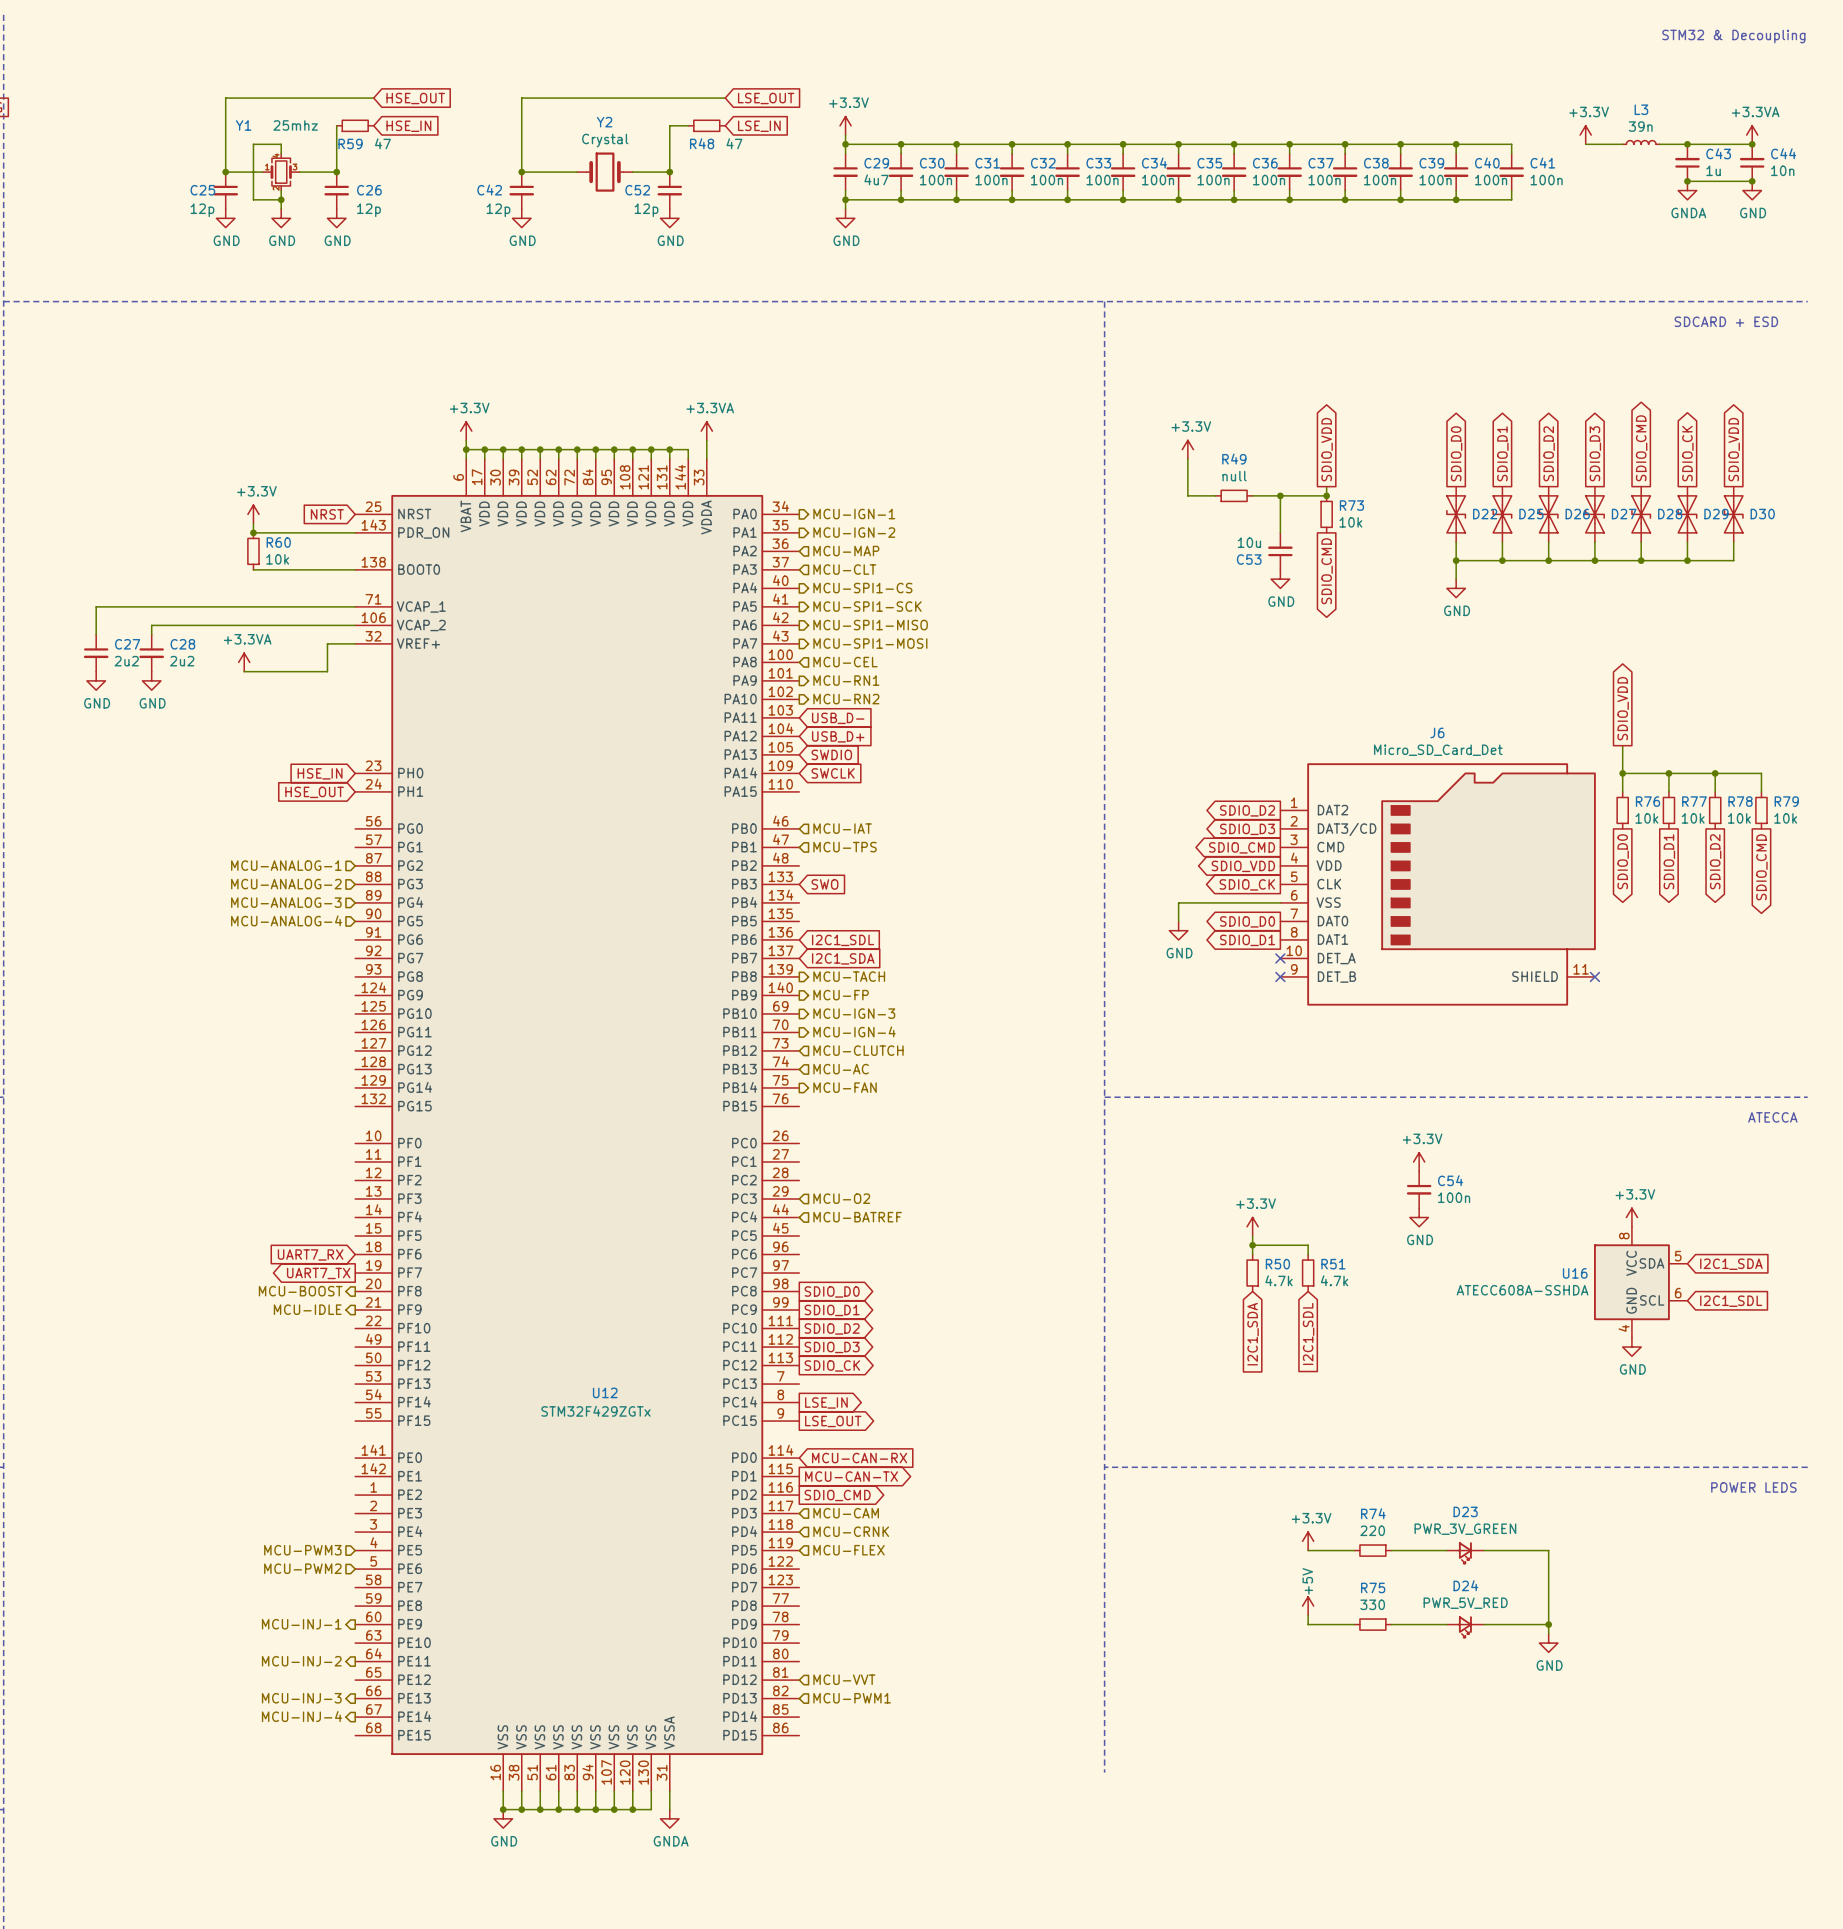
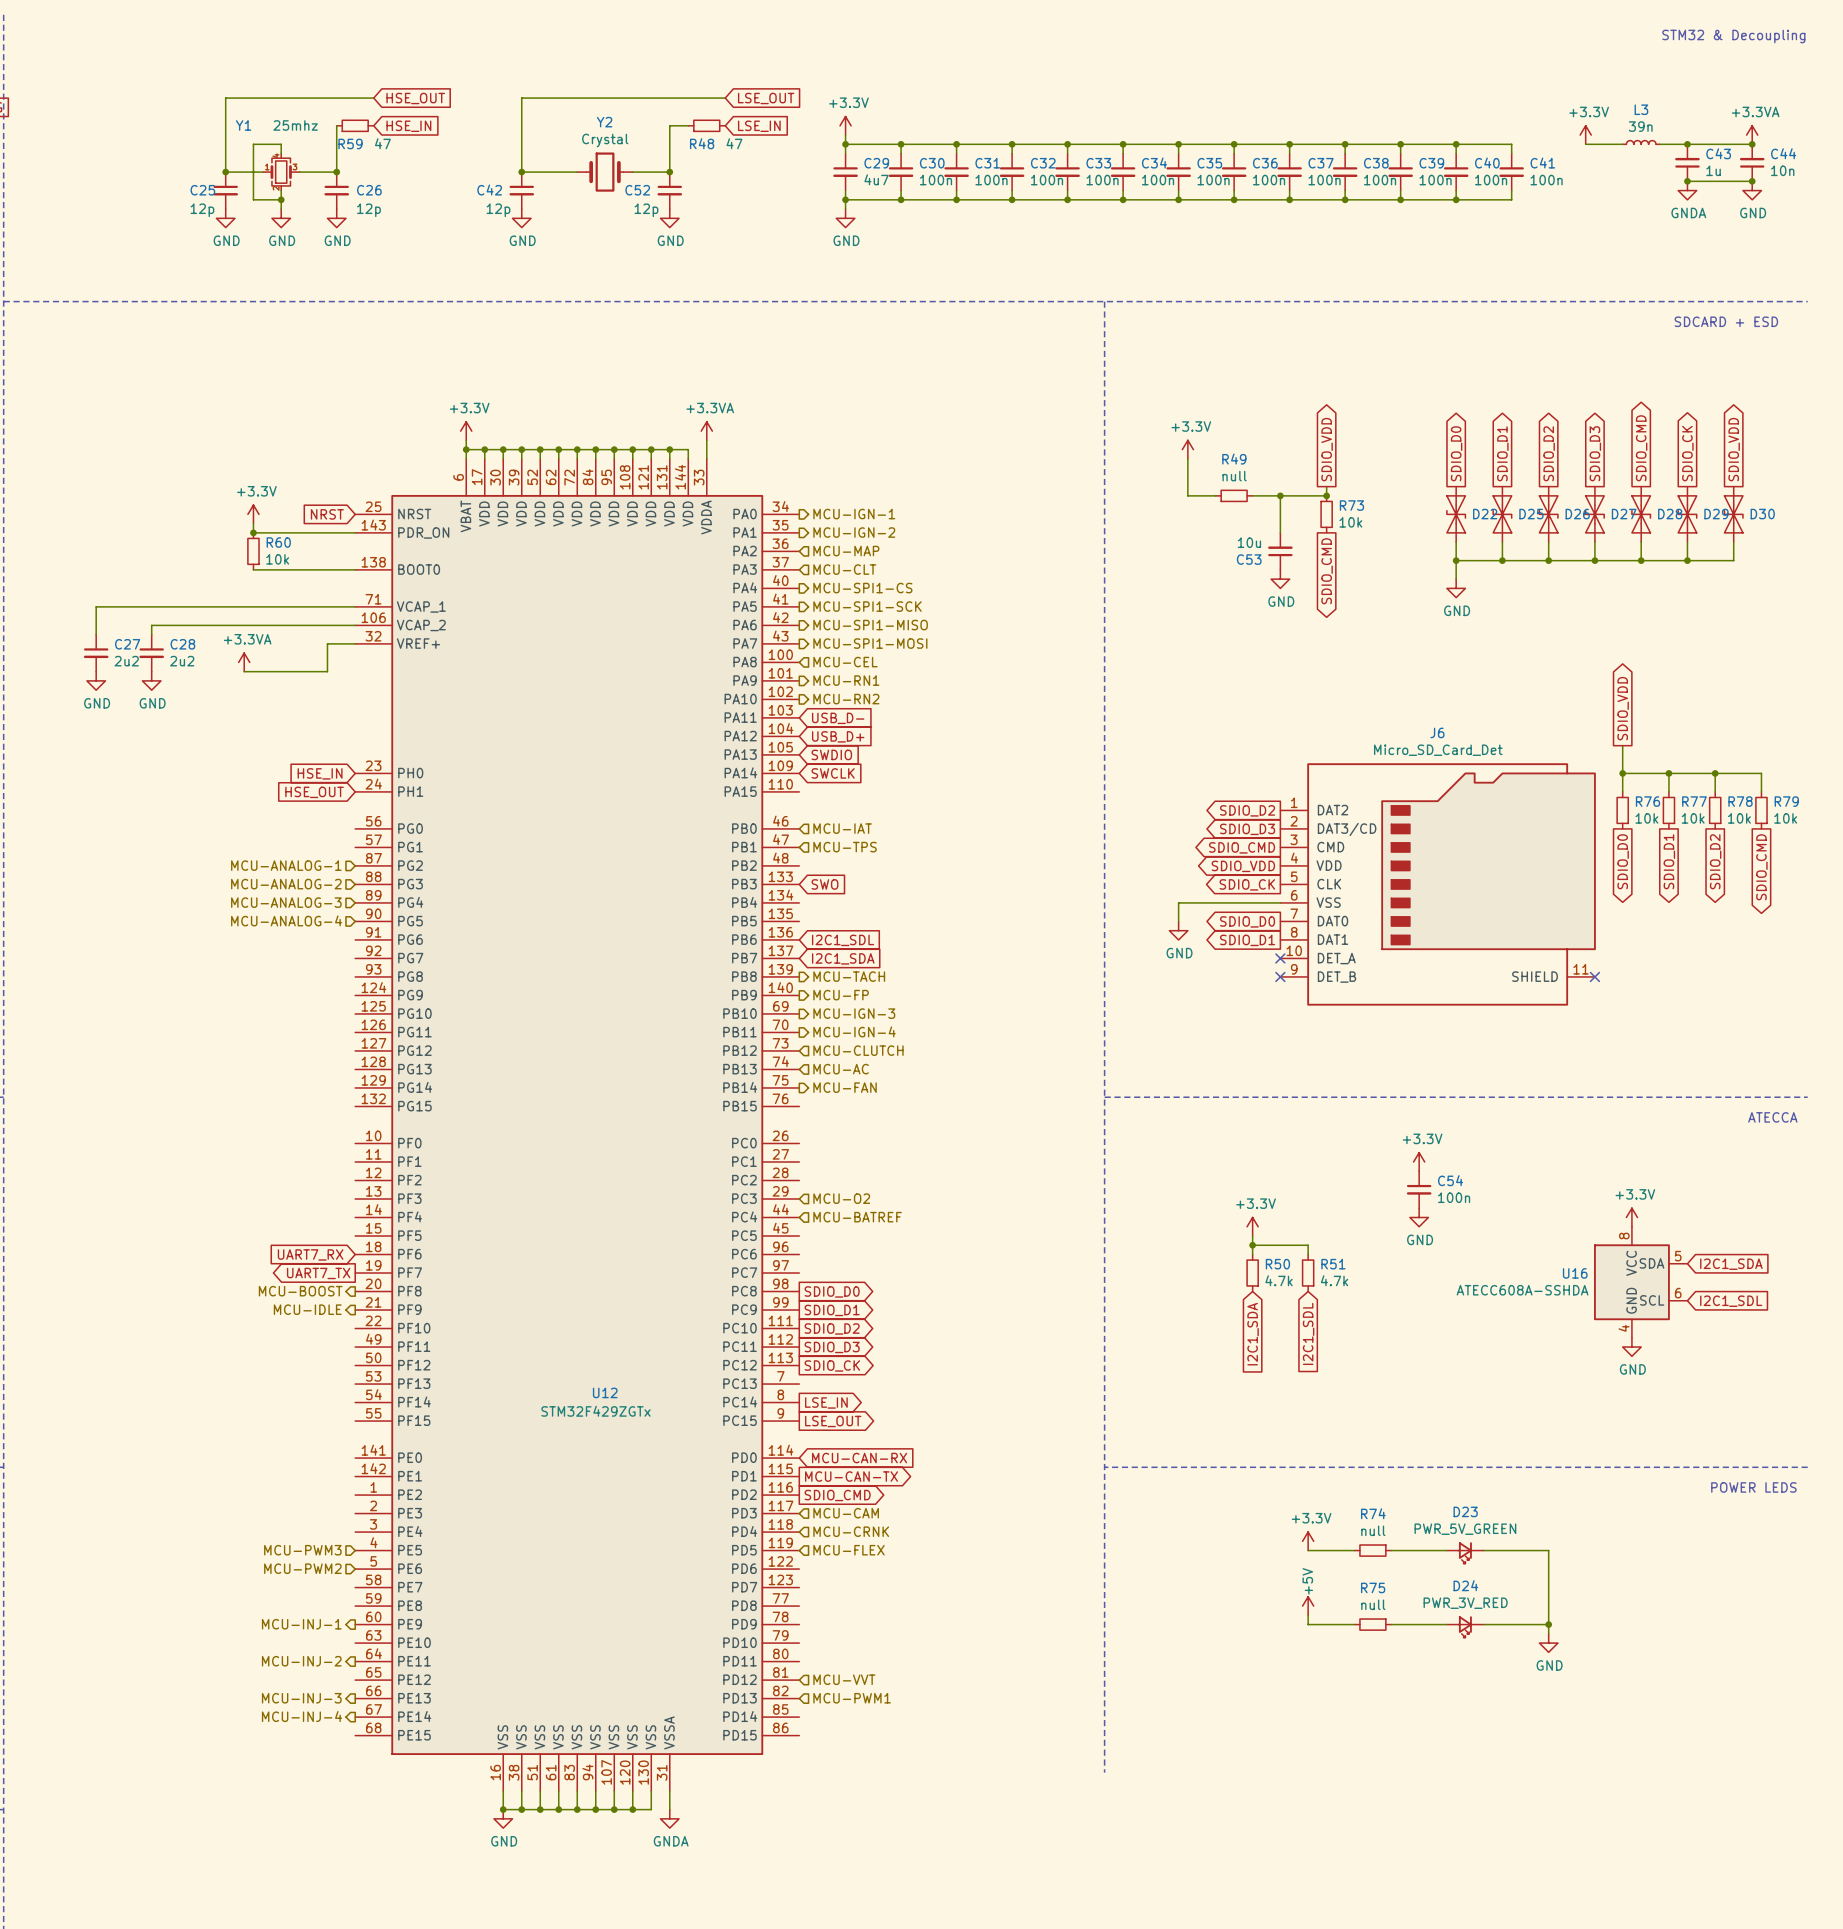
D23 value: PWR_3V_GREEN (1465, 1529) -> PWR_5V_GREEN (1465, 1529)
R74 value: 220 (1372, 1530) -> null (1373, 1530)
D24 value: PWR_5V_RED (1465, 1603) -> PWR_3V_RED (1465, 1603)
R75 value: 330 (1372, 1604) -> null (1373, 1604)

